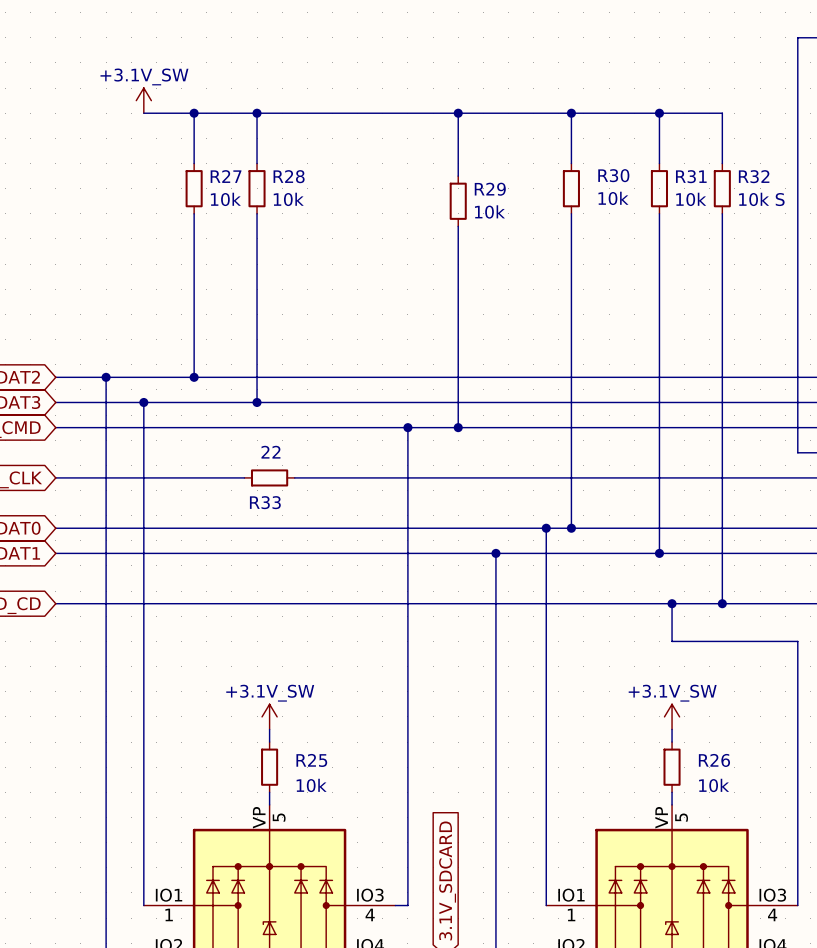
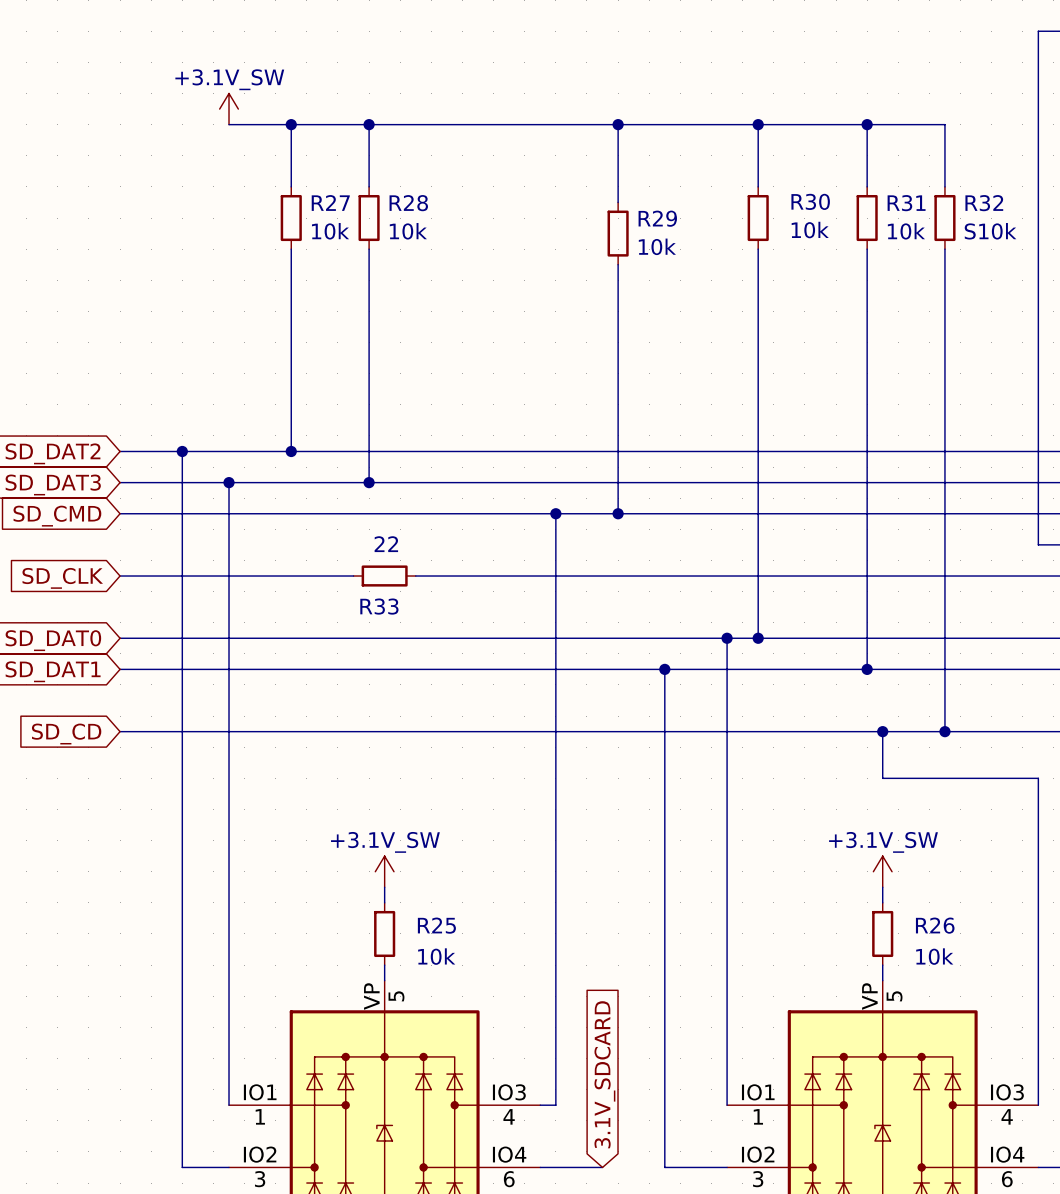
R32 value: 10k S (761, 199) -> S10k (990, 231)

